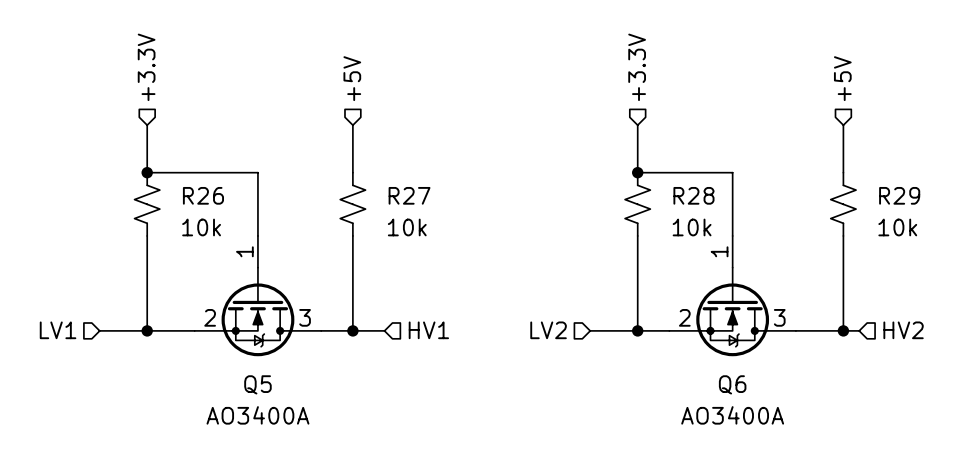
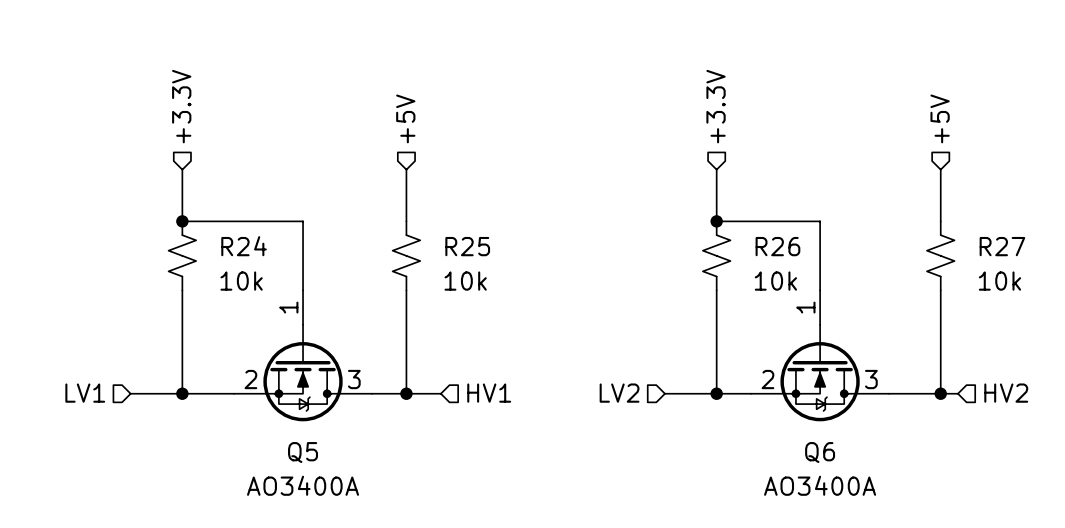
R26 name: R26 (203, 195) -> R24 (244, 246)
R27 name: R27 (409, 195) -> R25 (467, 246)
R28 name: R28 (693, 195) -> R26 (777, 246)
R29 name: R29 (899, 195) -> R27 (1002, 246)

